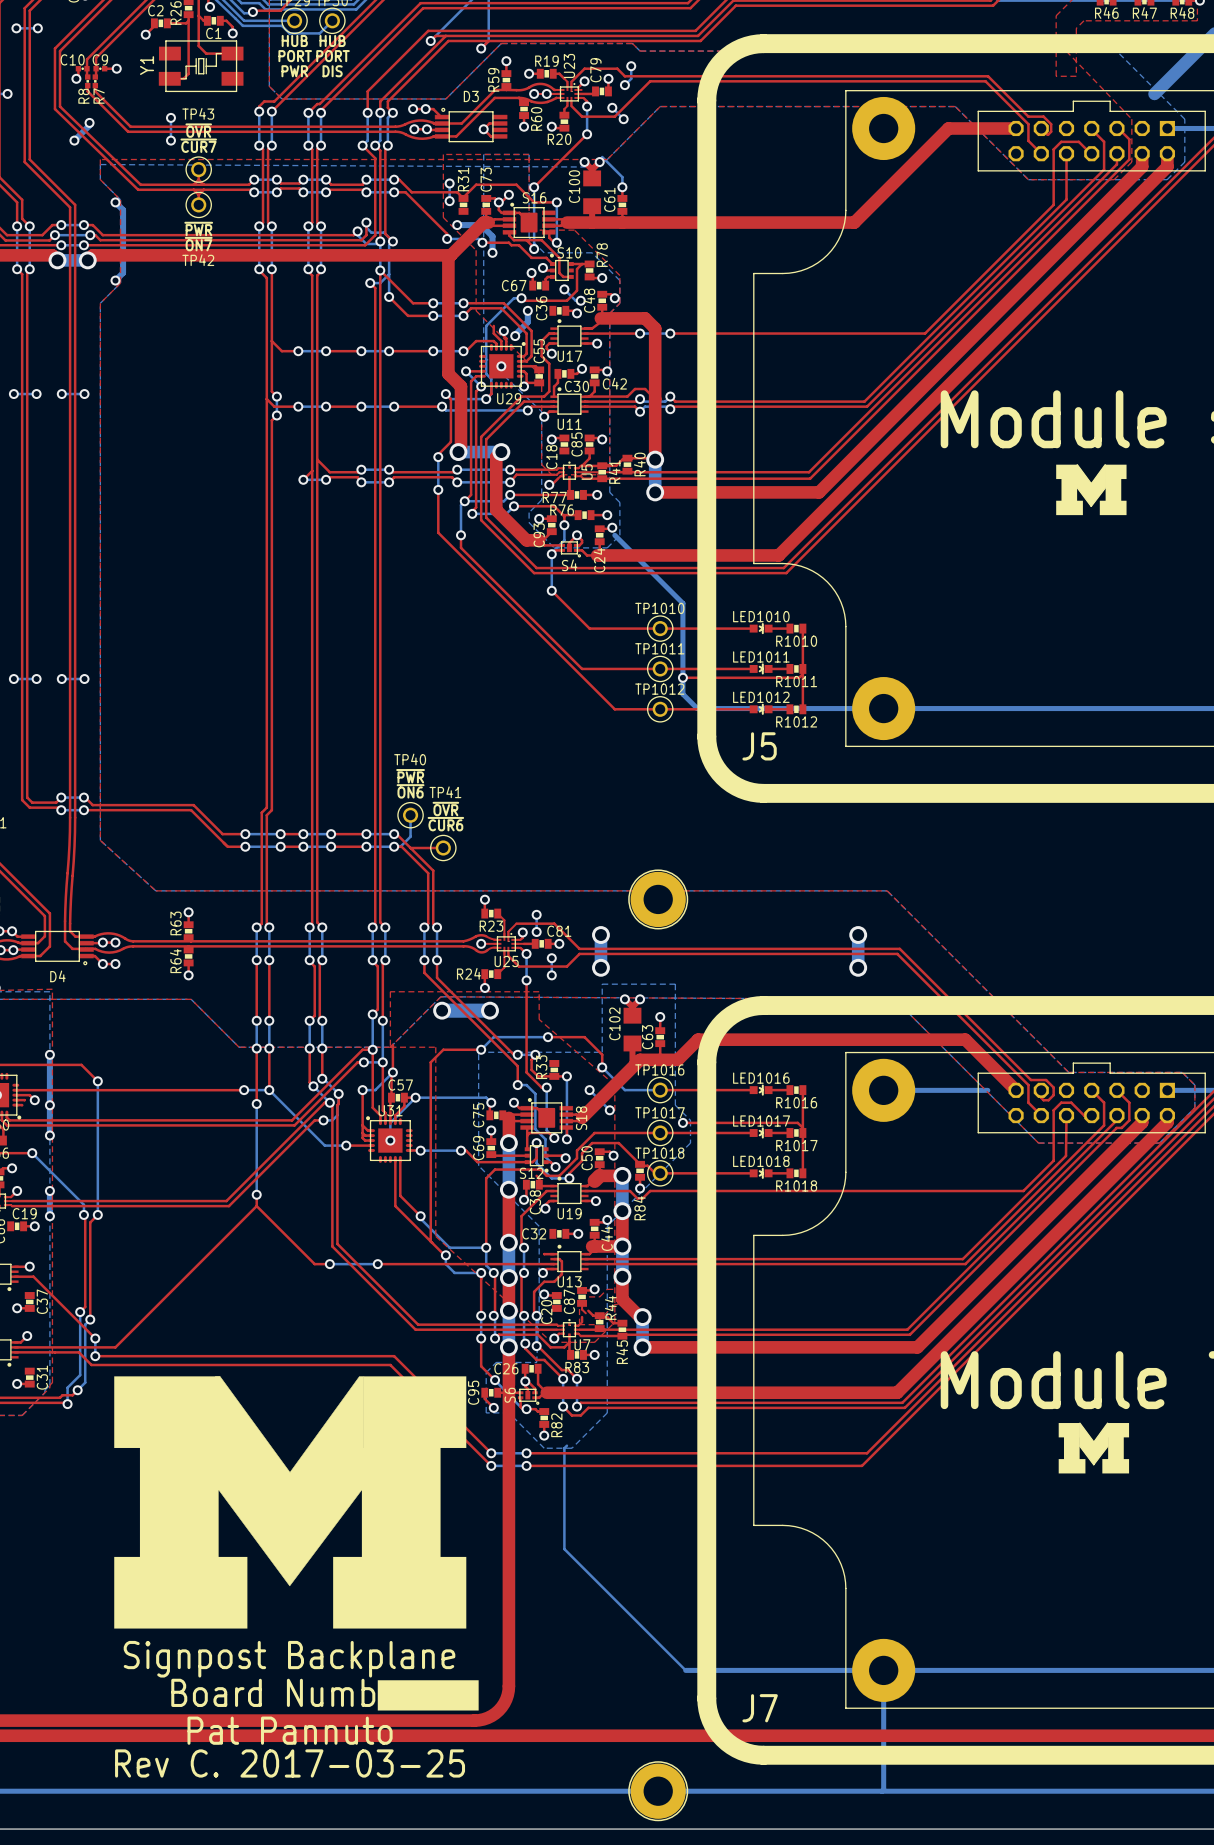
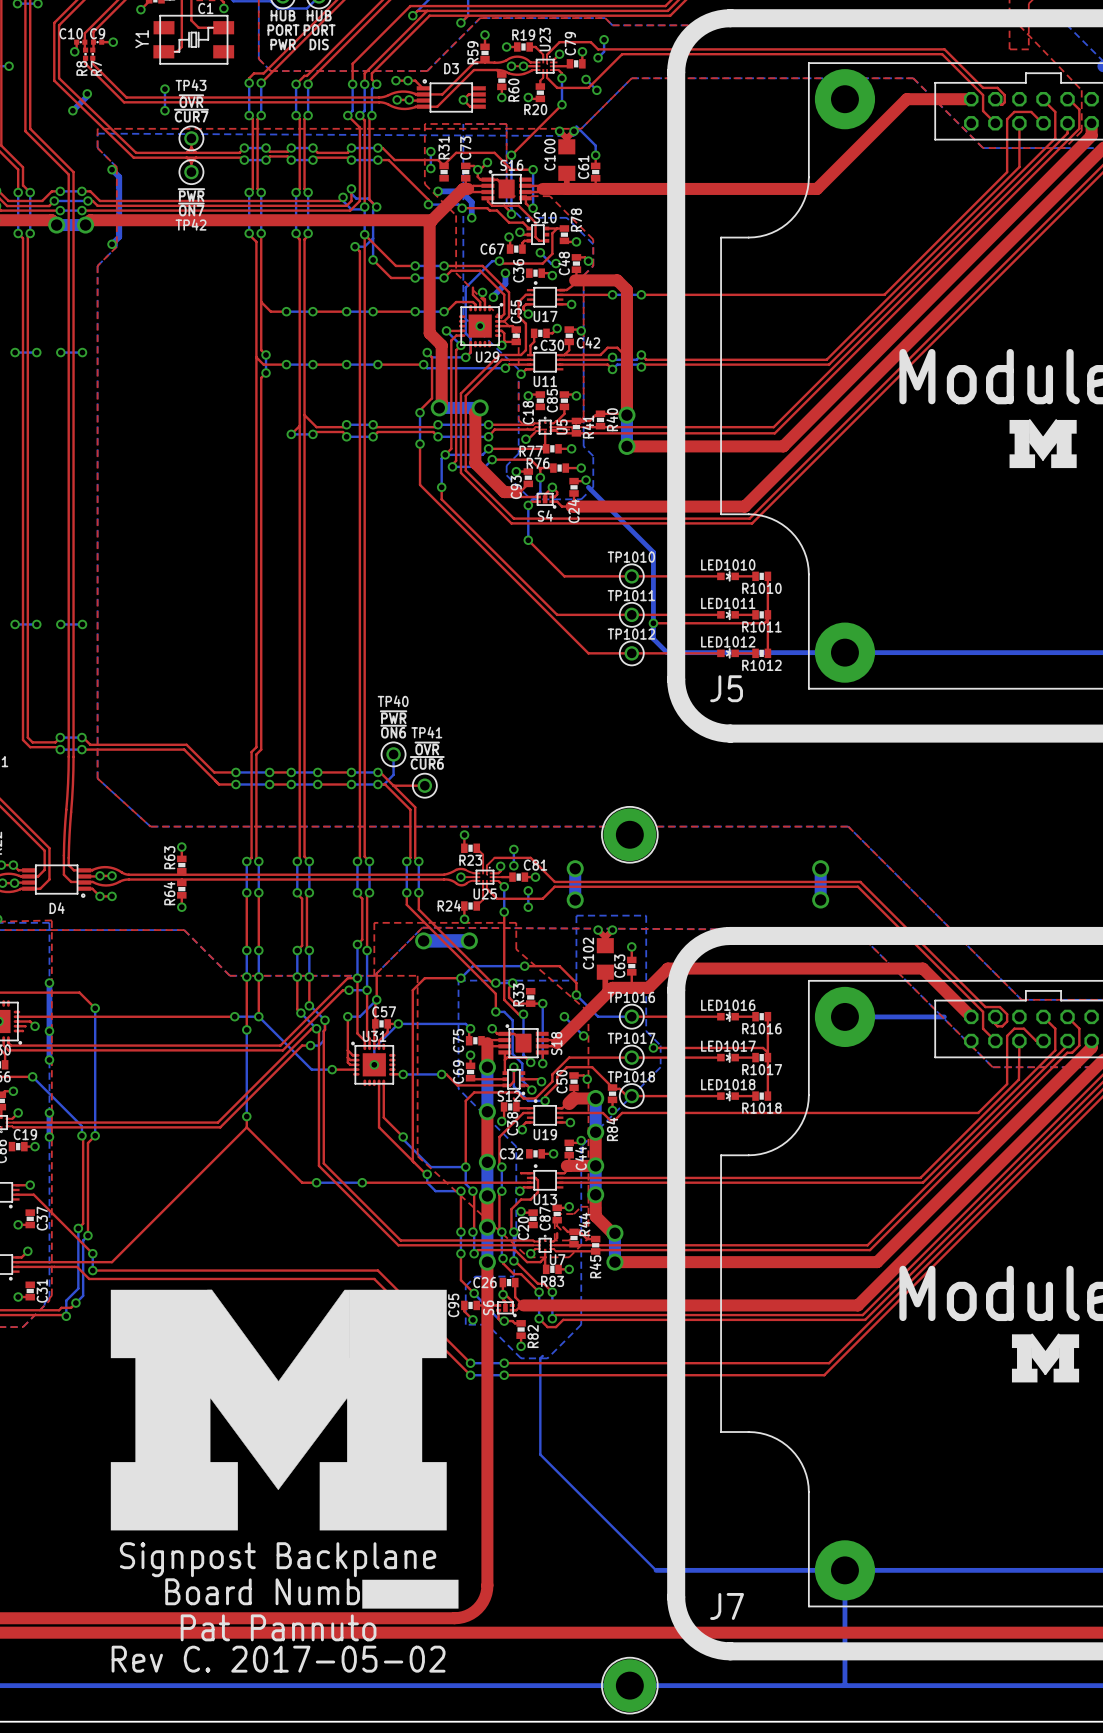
text: Rev C. 2017-03-25 (290, 1763) -> Rev C. 2017-05-02 (278, 1659)

